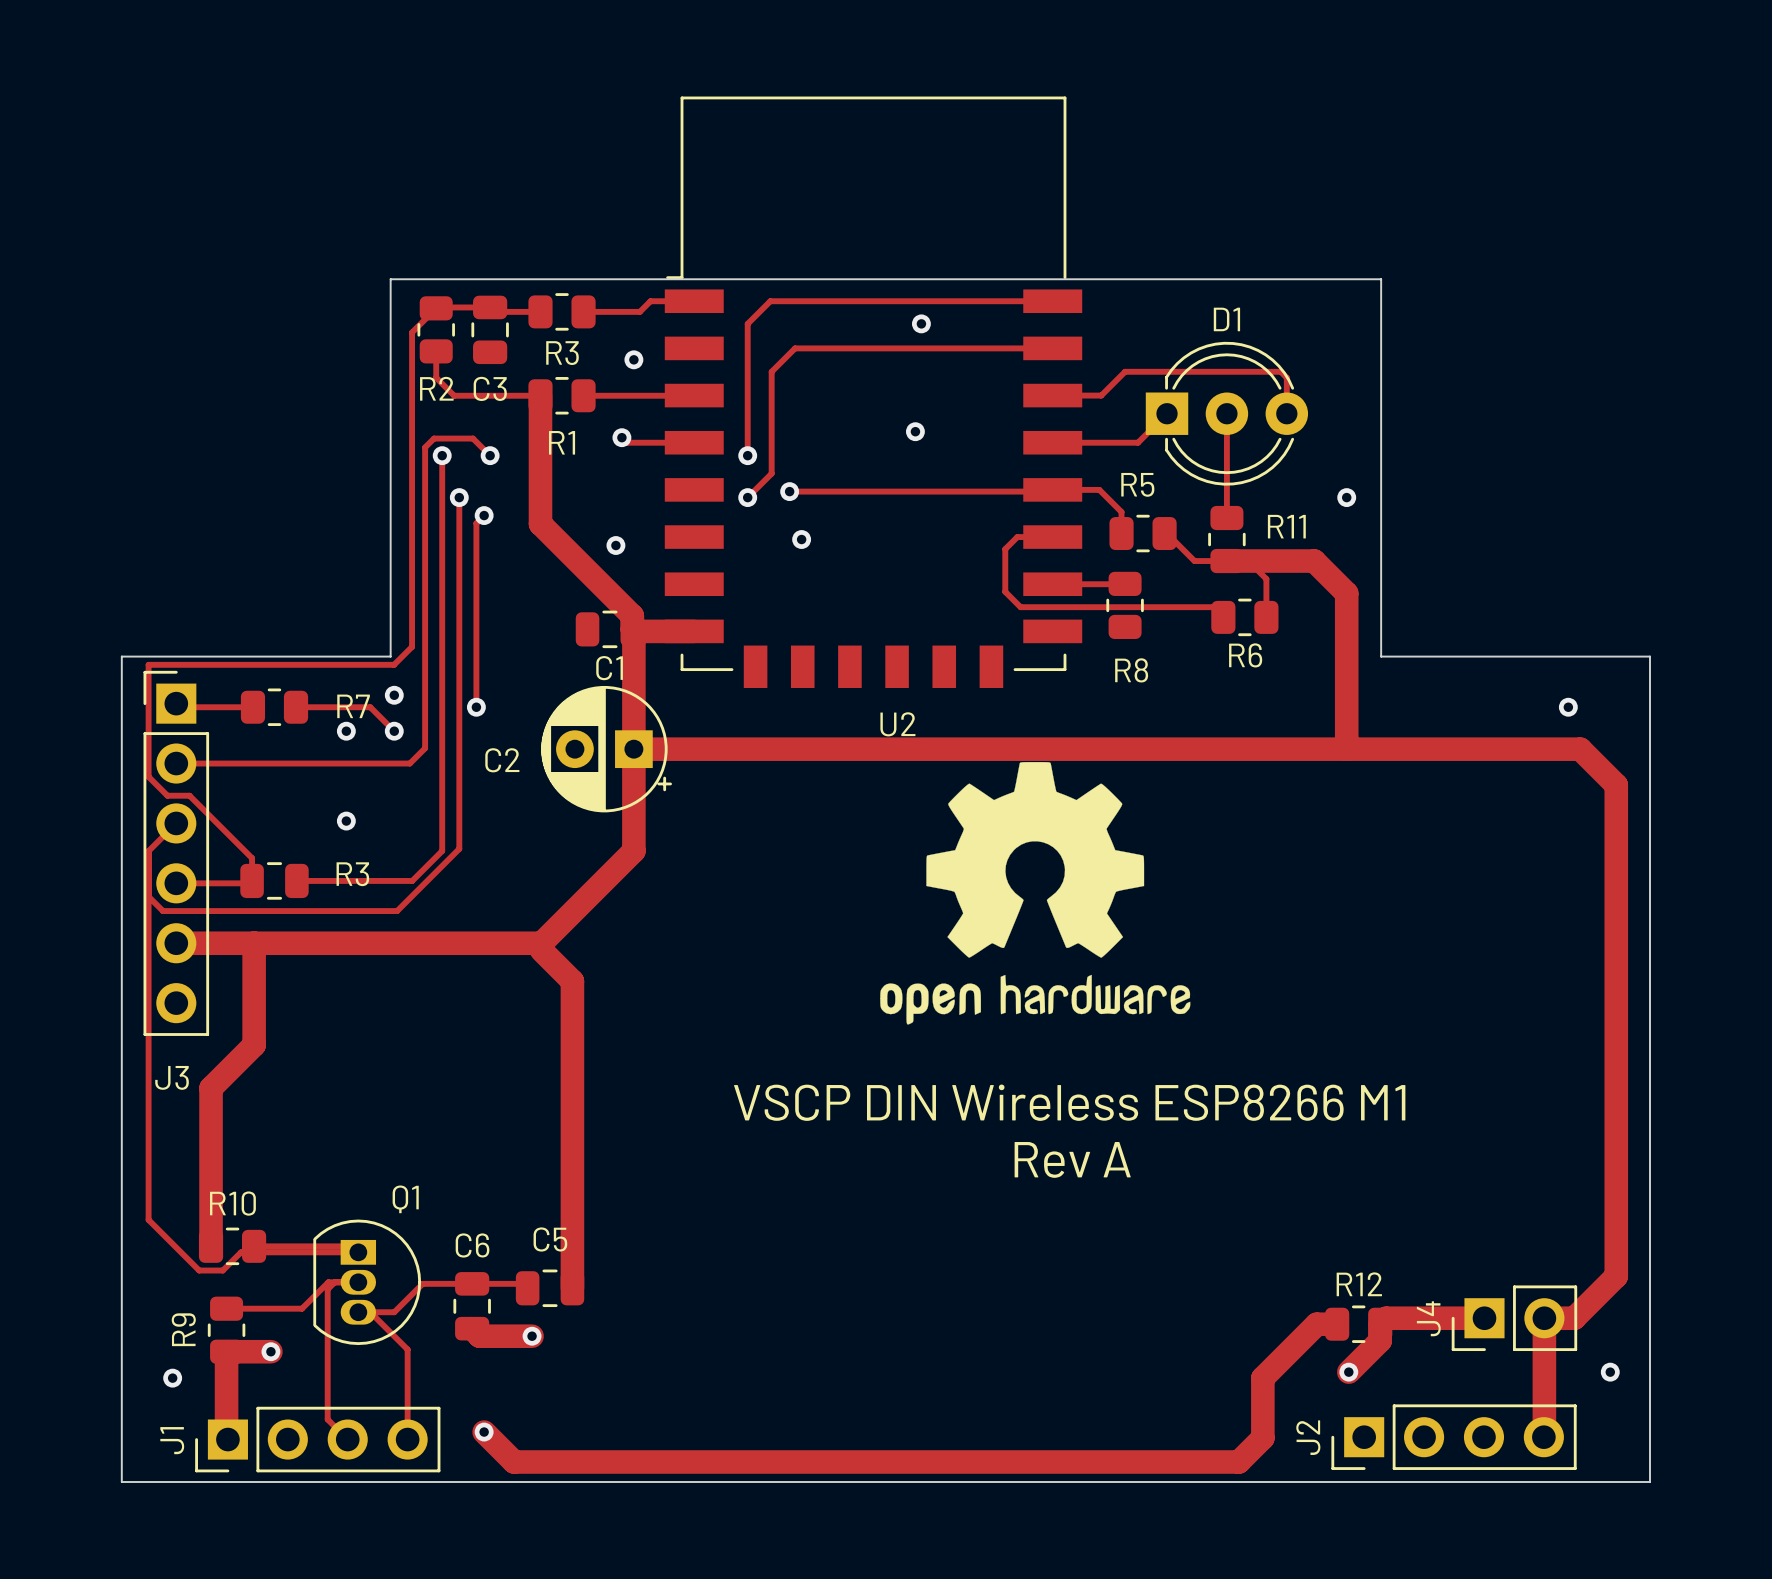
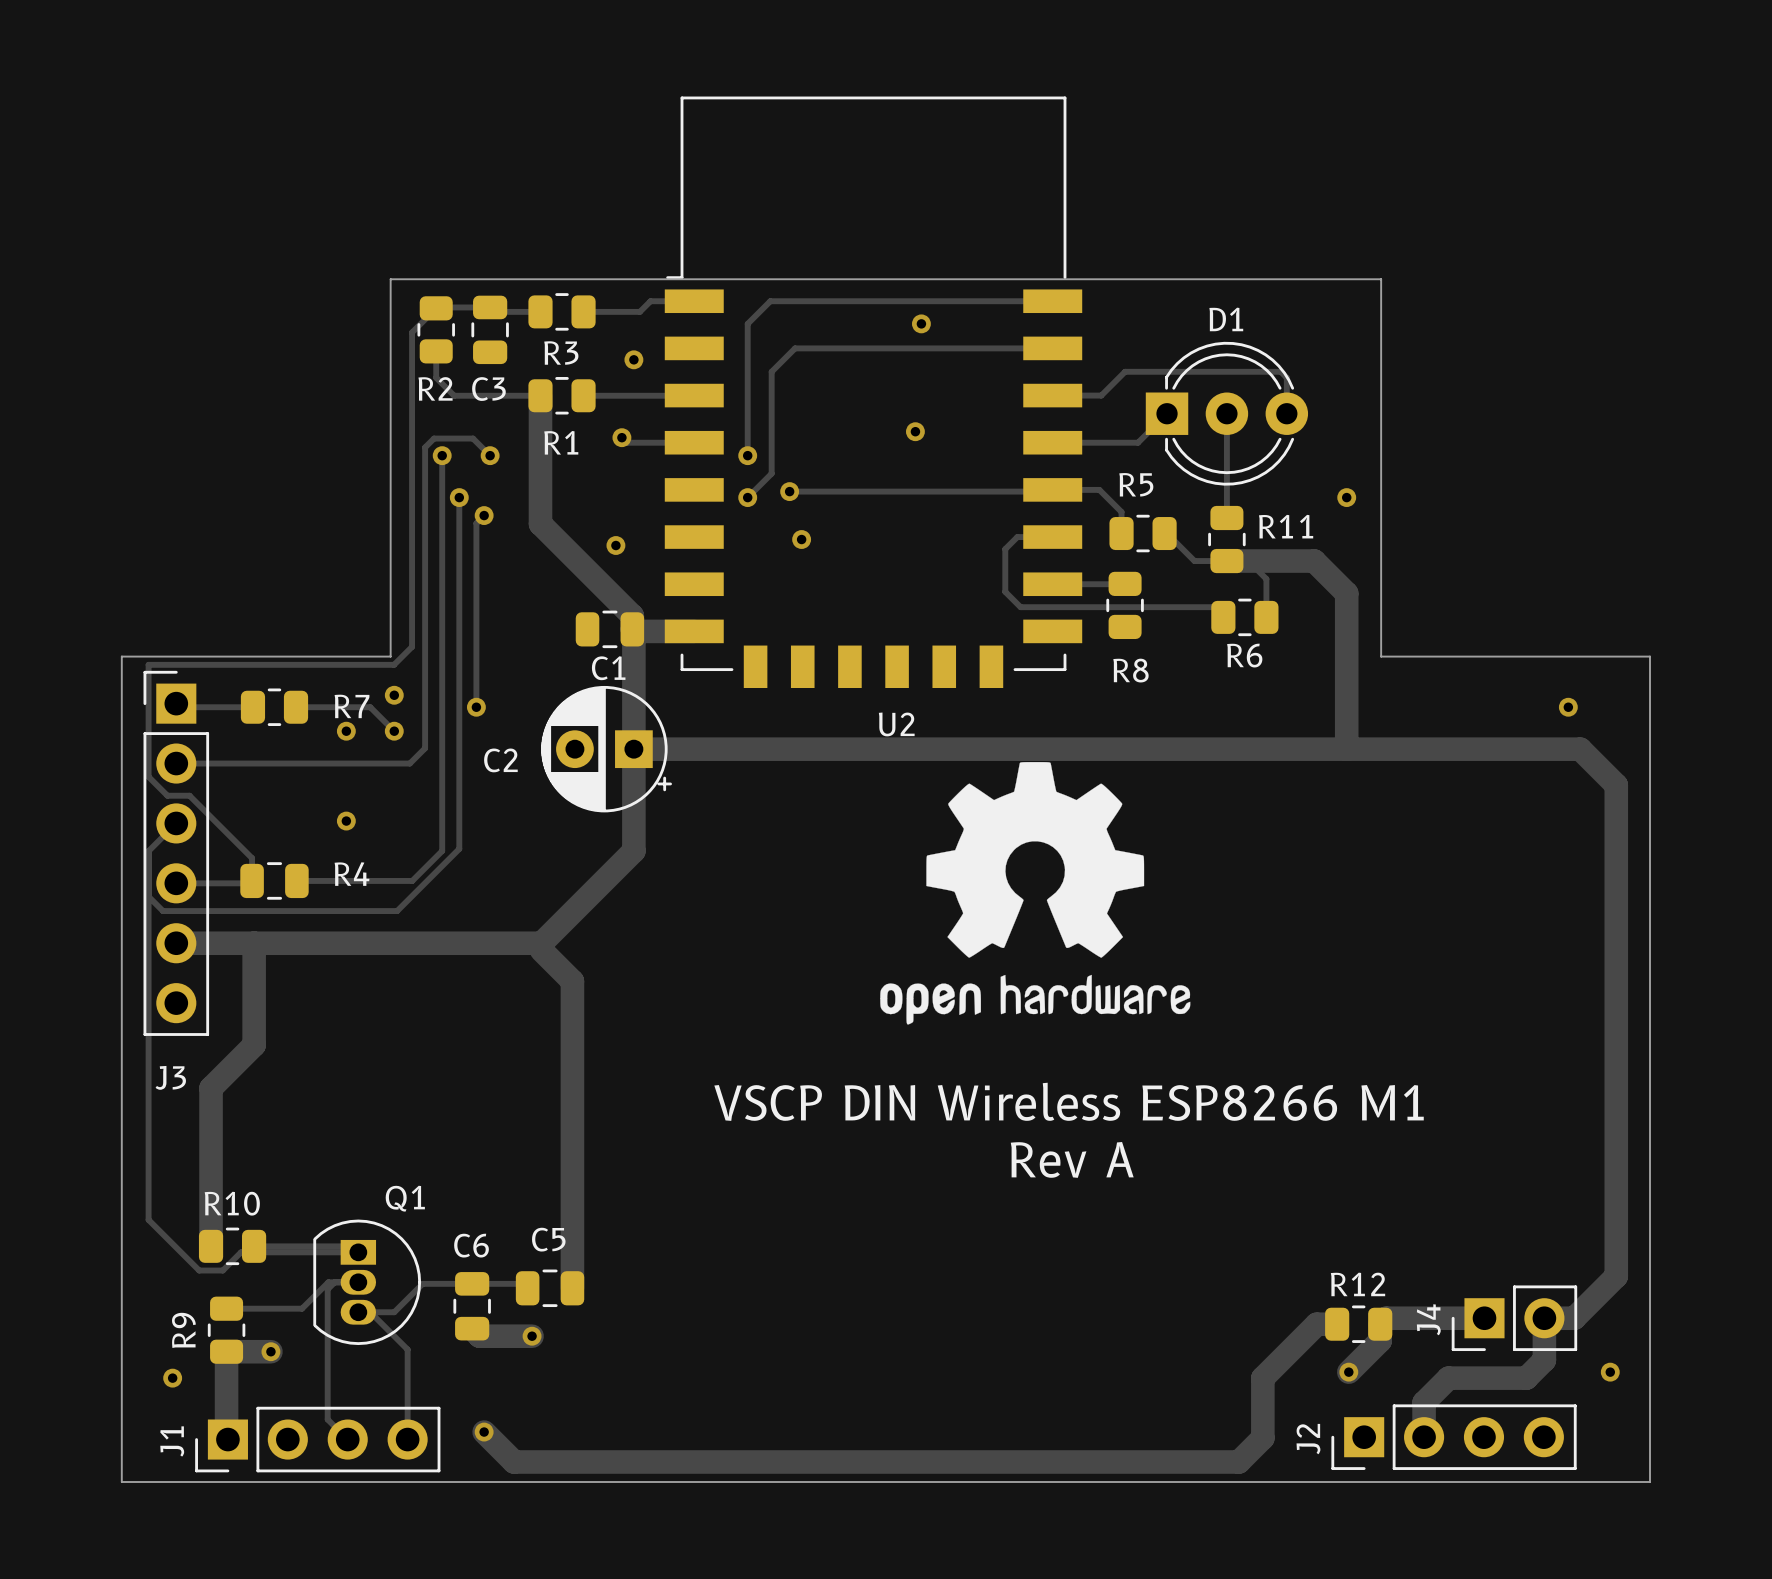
R3 name: R3 (352, 874) -> R4 (352, 874)
track: (1544, 1360) (1543, 1437) -> (1544, 1360) (1526, 1378) (1448, 1378) (1424, 1402) (1424, 1437)

